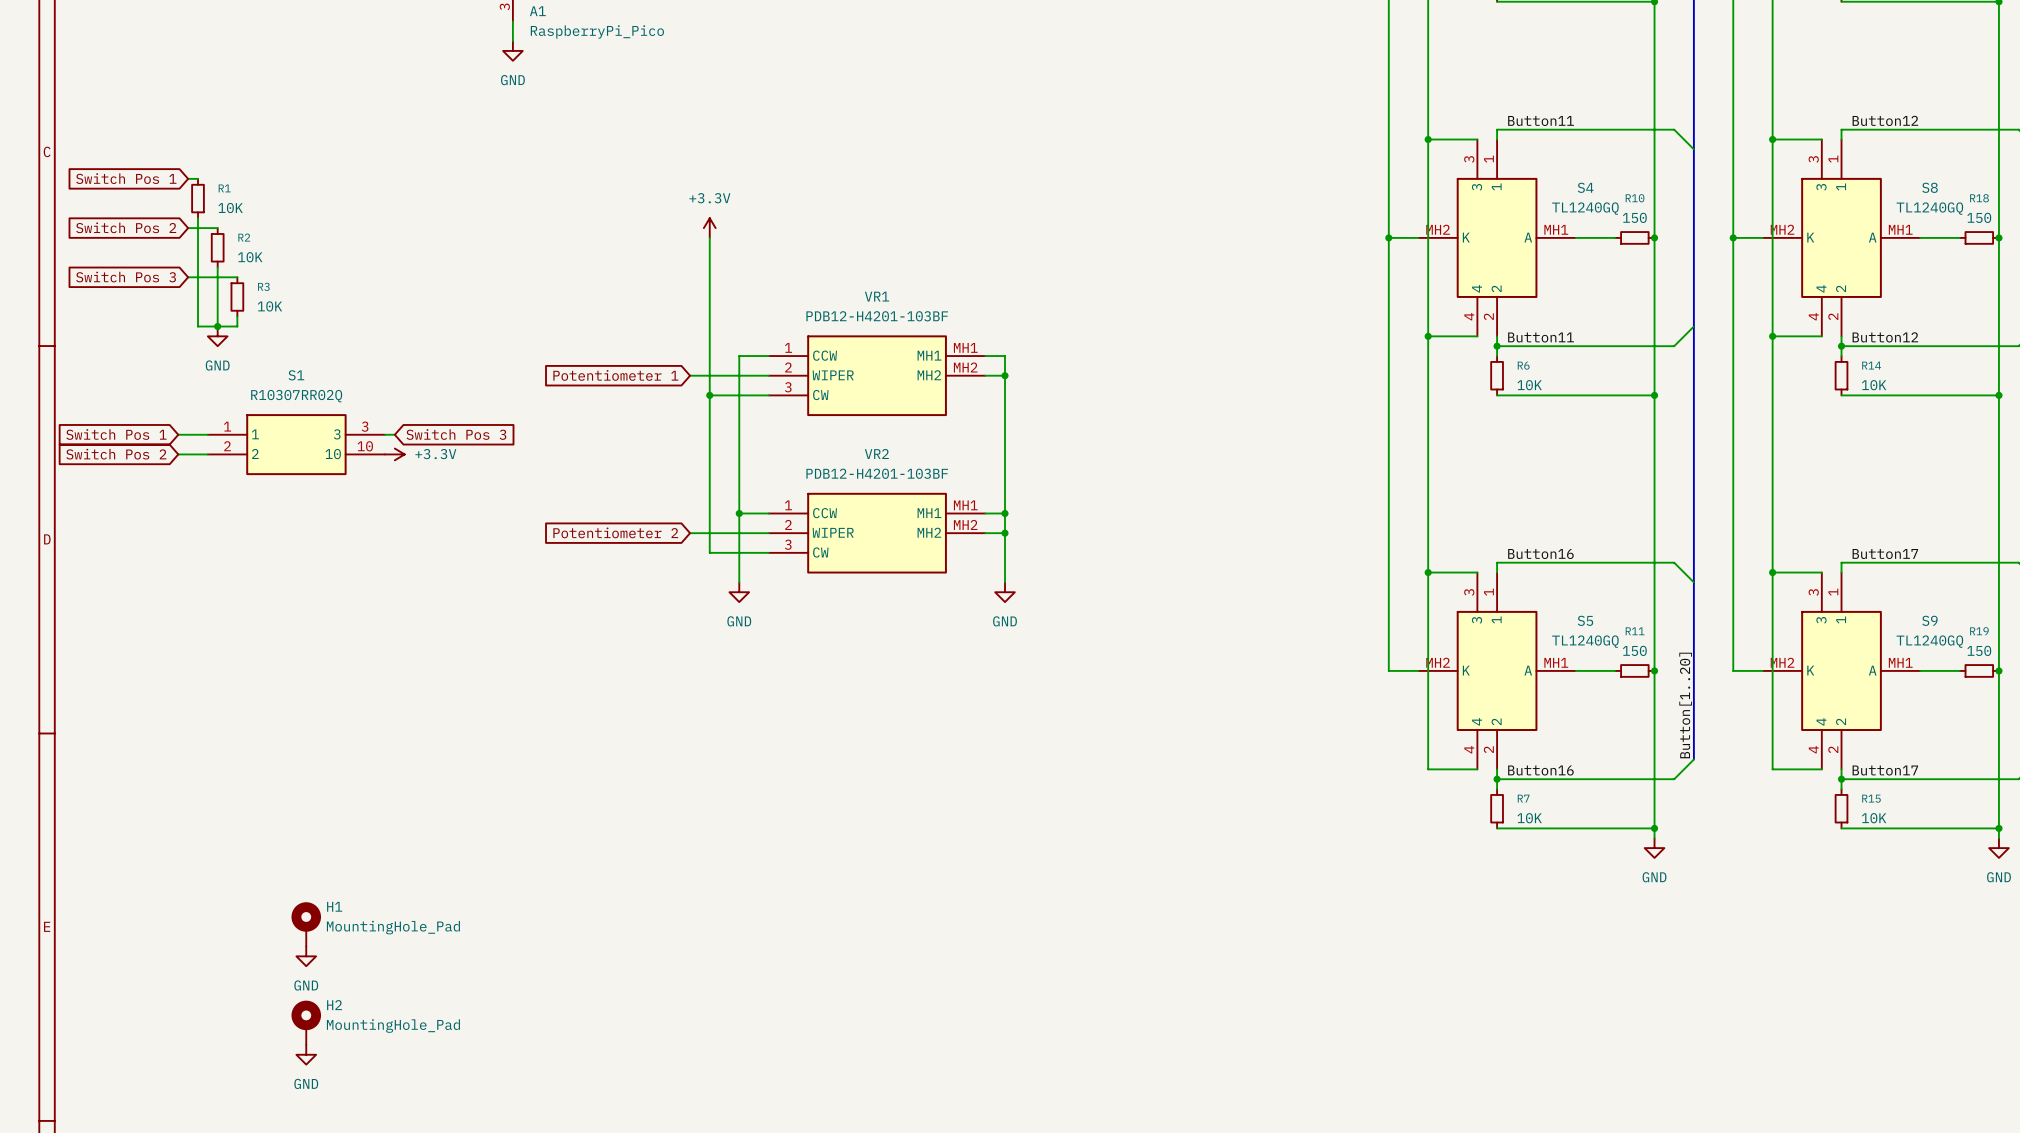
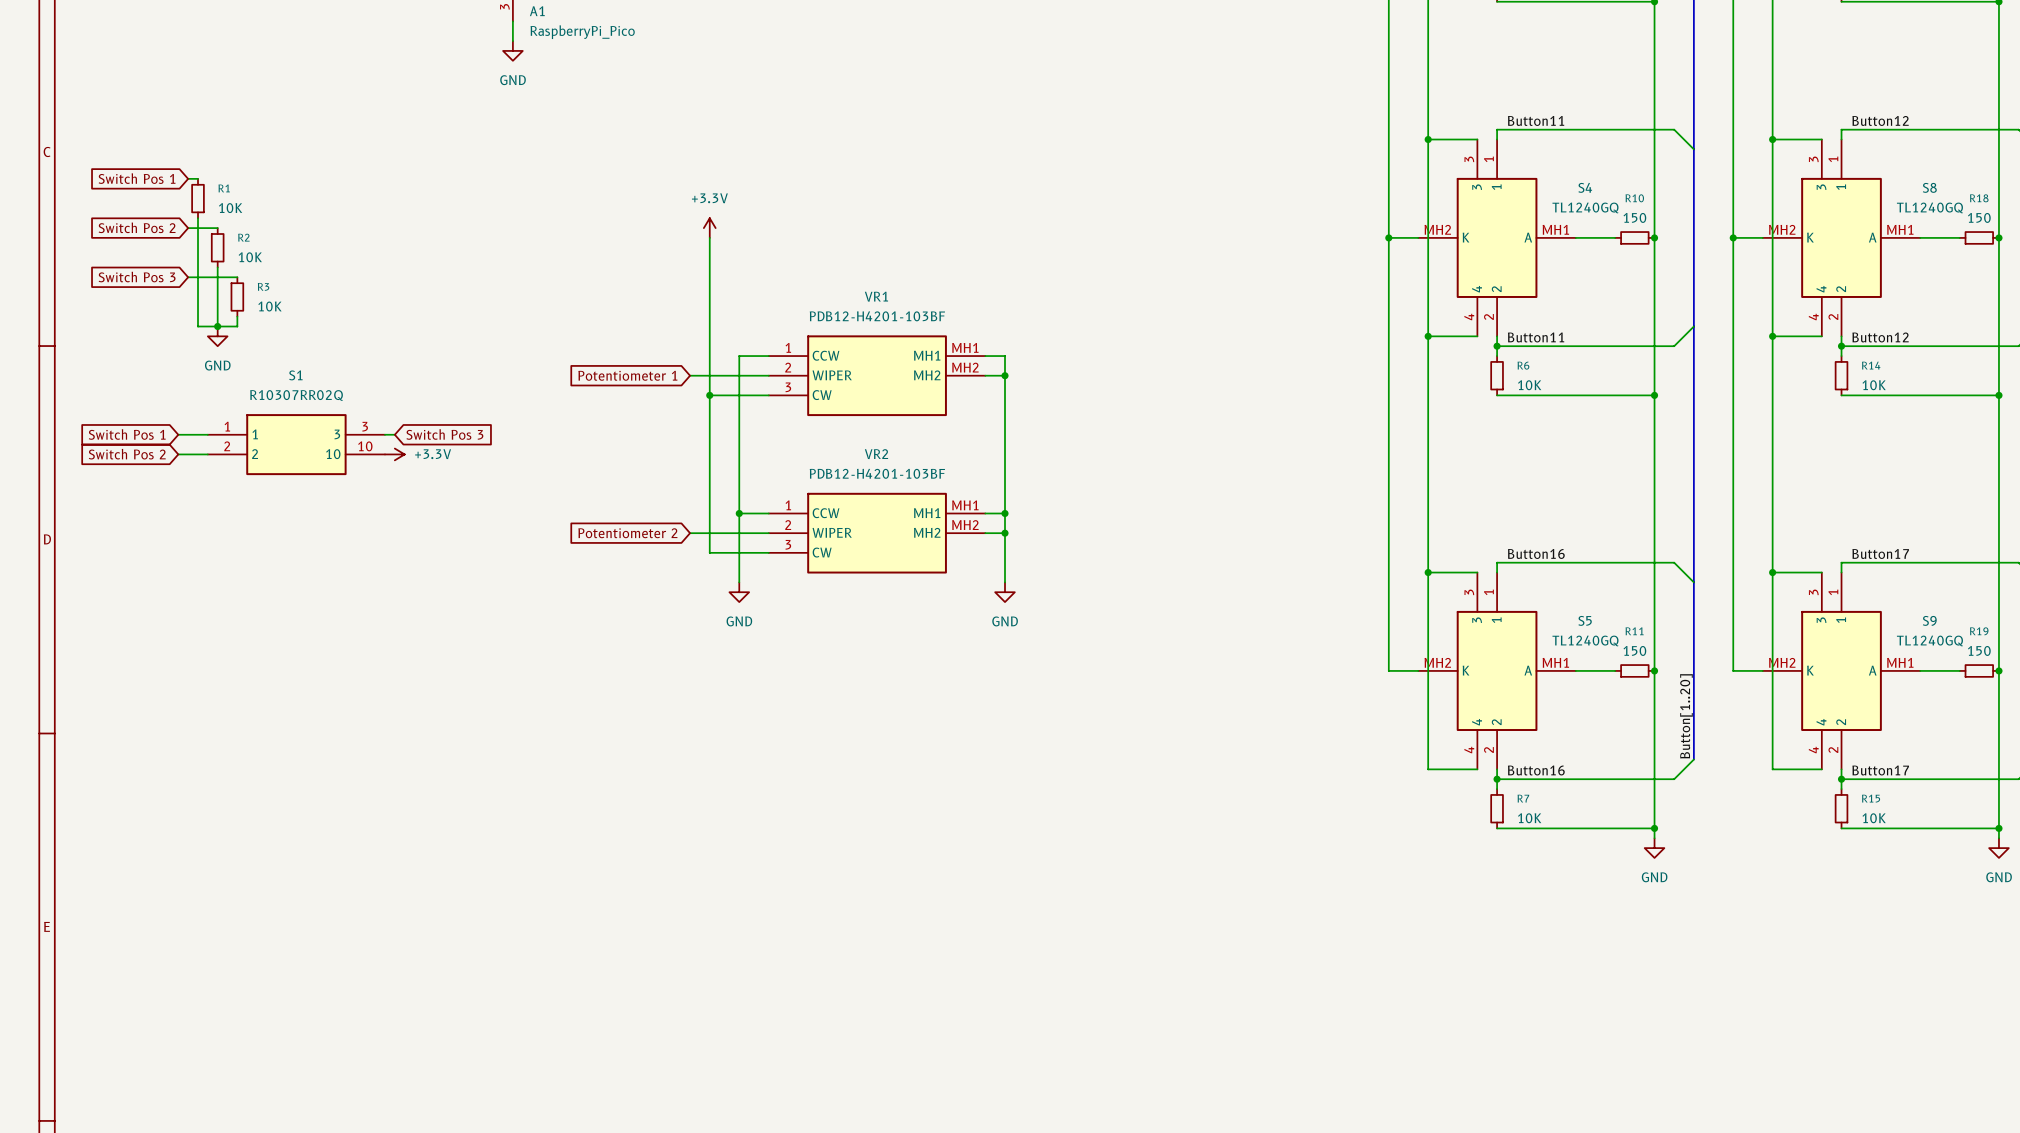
H1: MountingHole_Pad (306, 924) -> none
power symbol: GND (306, 956) -> none
H2: MountingHole_Pad (306, 1022) -> none
power symbol: GND (306, 1054) -> none

